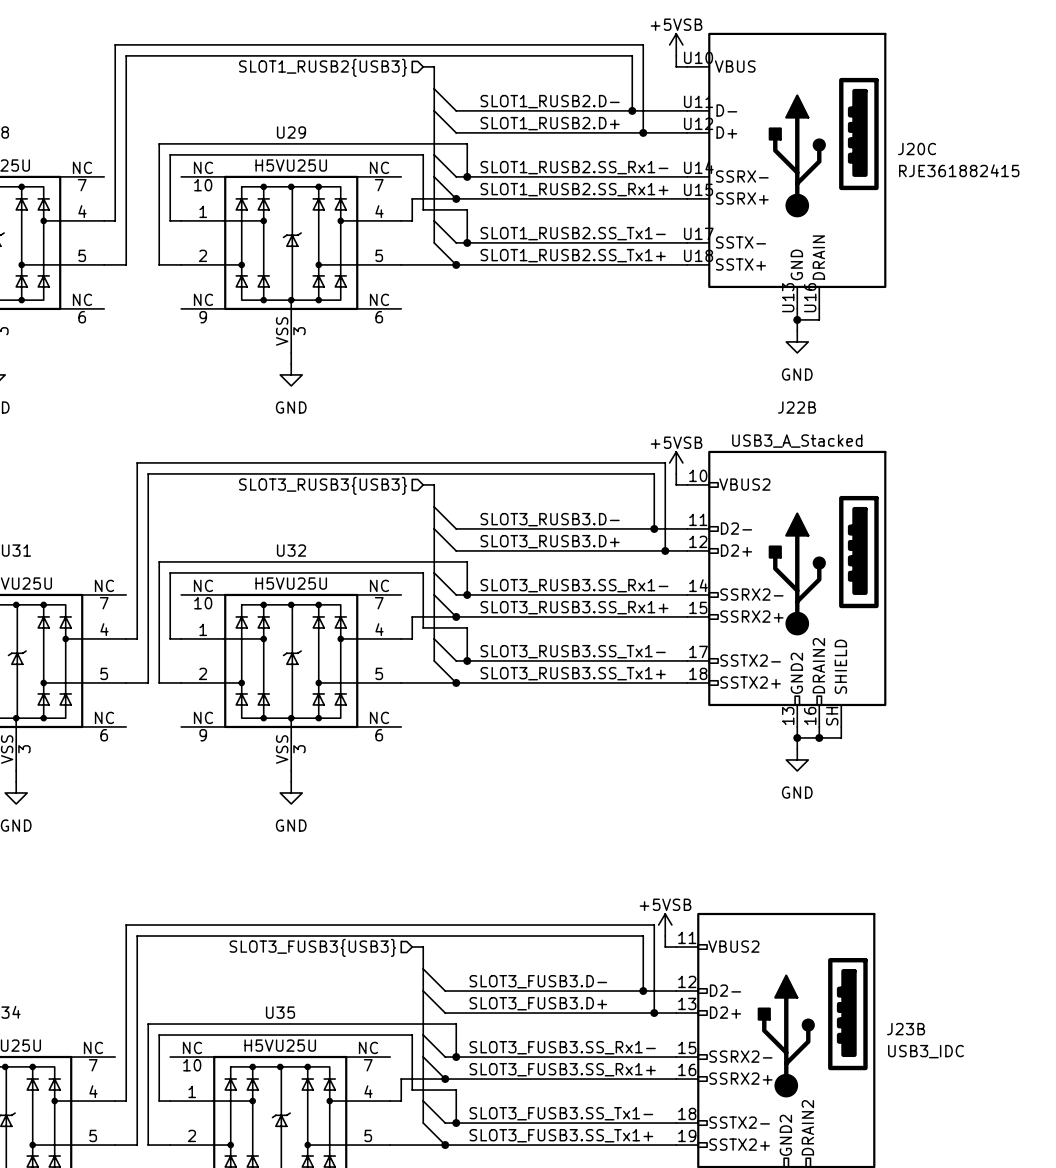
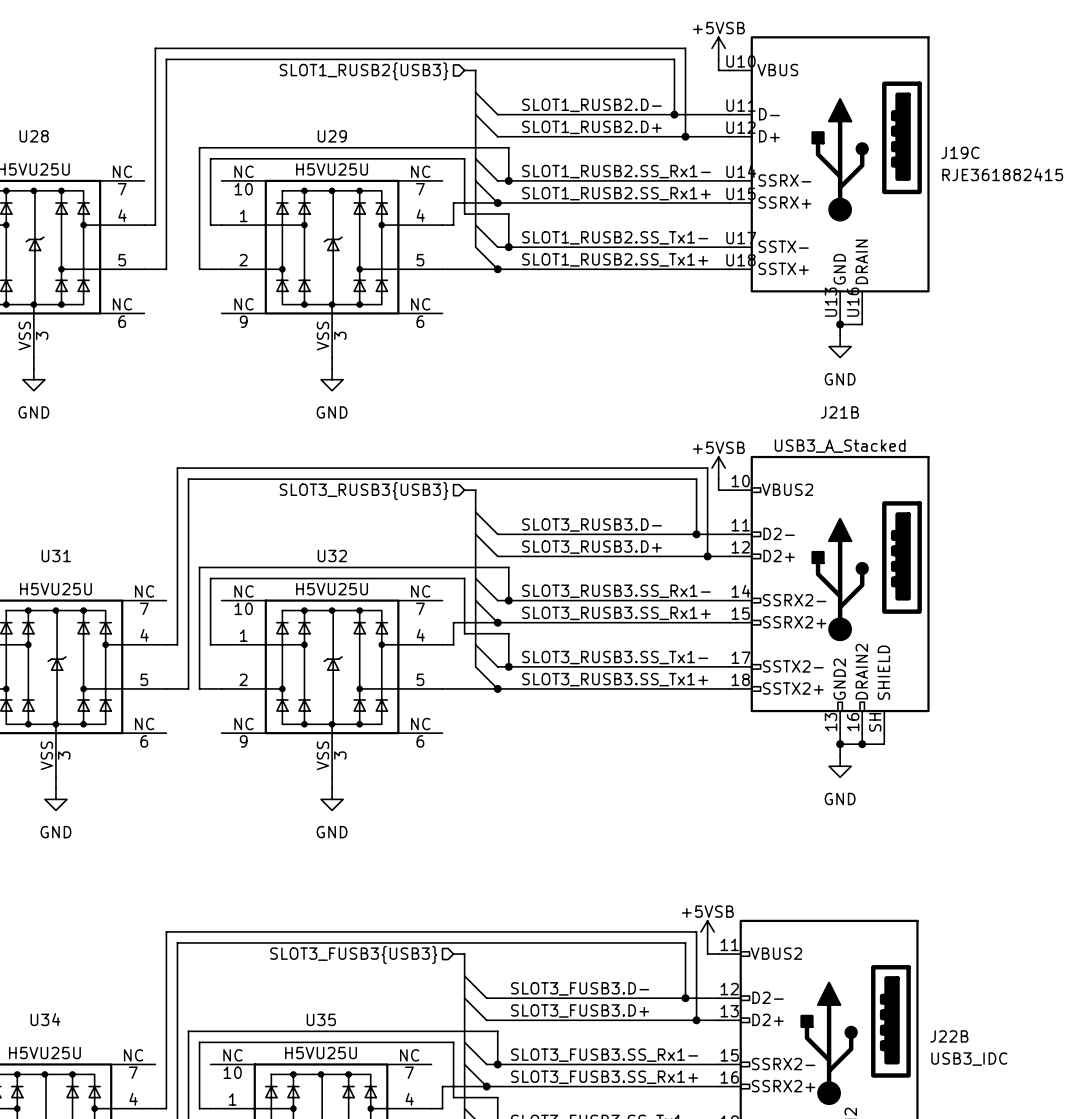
J20C name: J20C (917, 149) -> J19C (960, 152)
J22B name: J22B (797, 407) -> J21B (839, 412)
J23B name: J23B (906, 1029) -> J22B (949, 1036)

